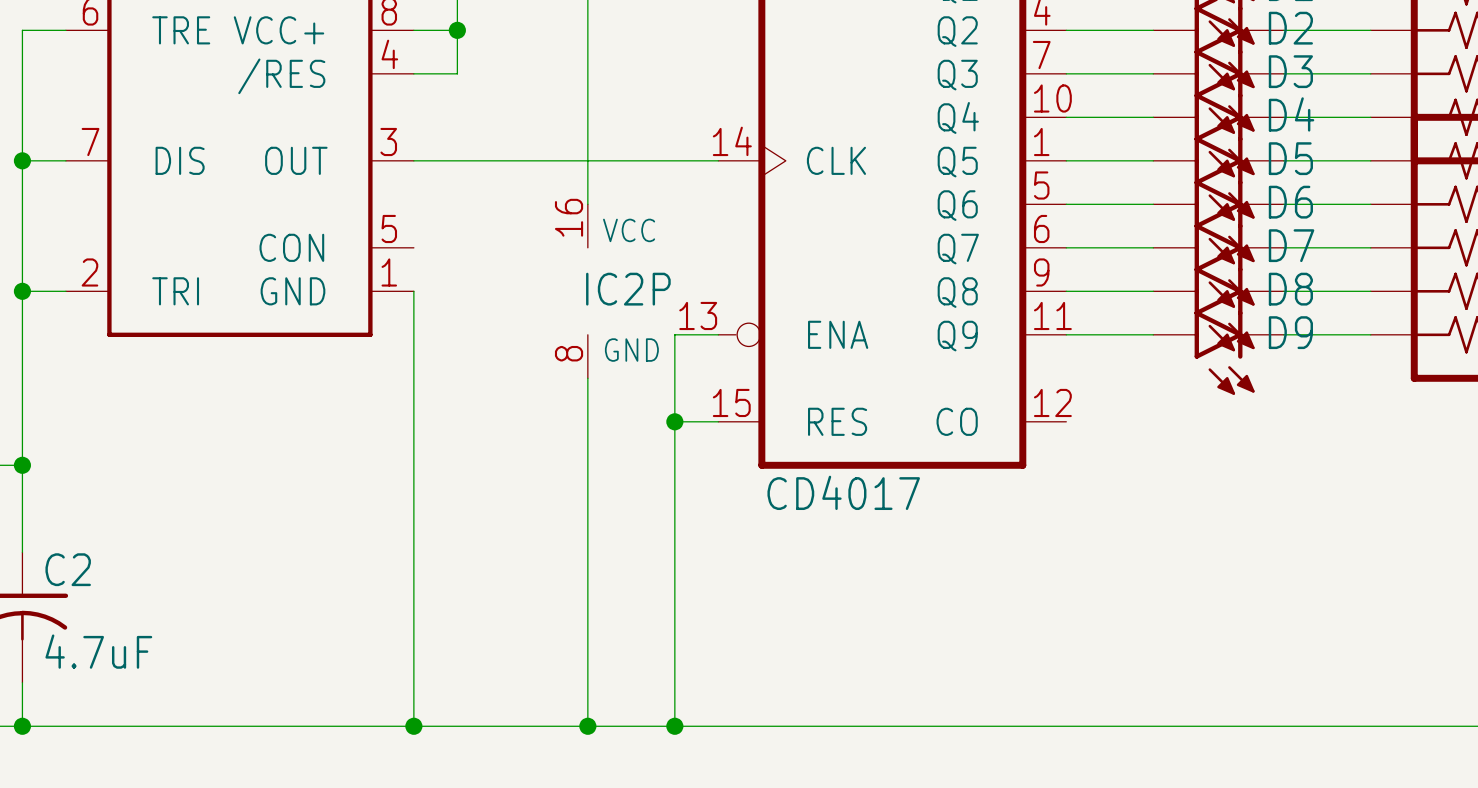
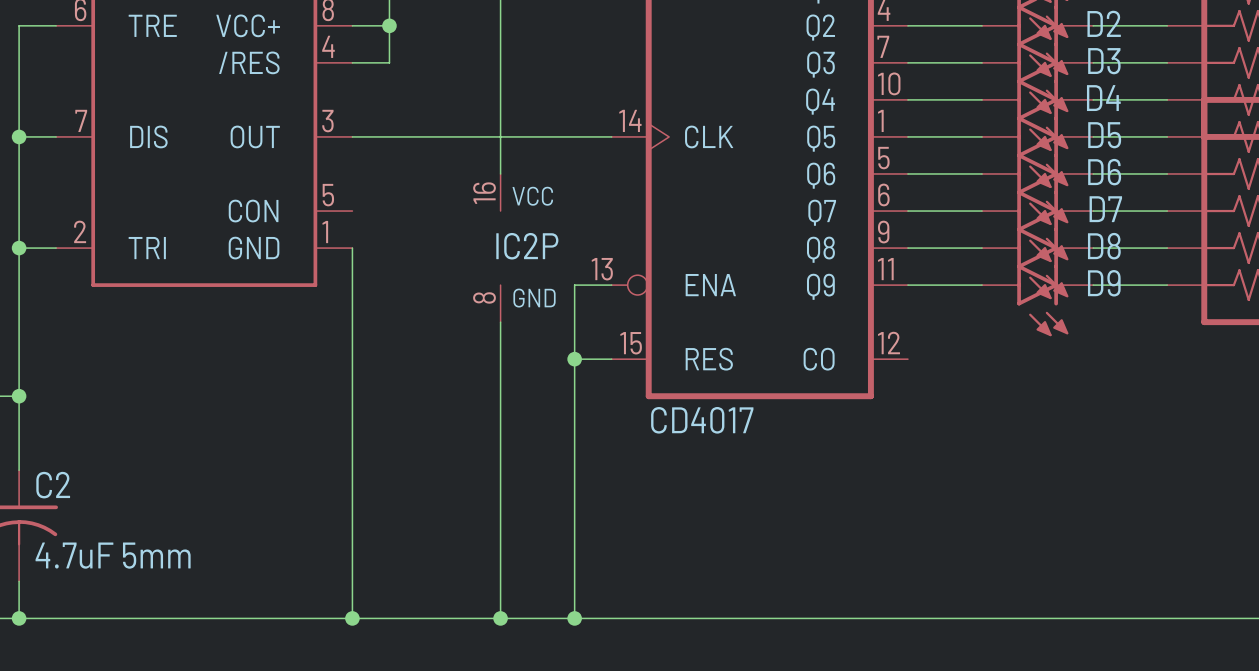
C2 value: 4.7uF (98, 651) -> 4.7uF 5mm (113, 555)

